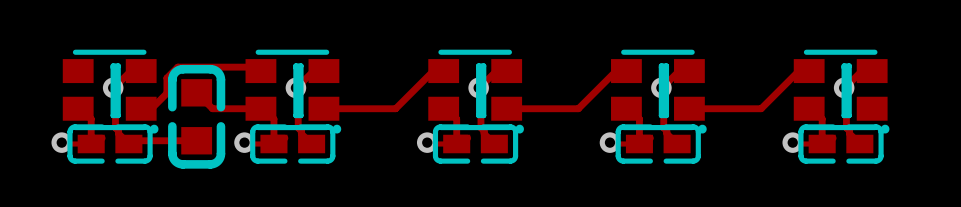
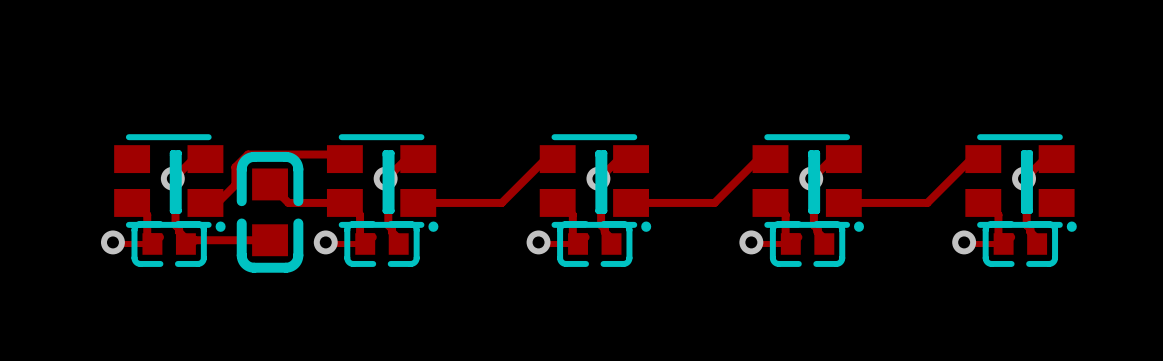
part footprint: [67, 124, 153, 164] -> [131, 221, 207, 267]
part footprint: [250, 124, 336, 164] -> [344, 221, 420, 267]
part footprint: [432, 124, 519, 164] -> [557, 221, 633, 267]
part footprint: [615, 124, 701, 164] -> [769, 221, 846, 267]
part footprint: [798, 124, 884, 164] -> [982, 221, 1059, 267]

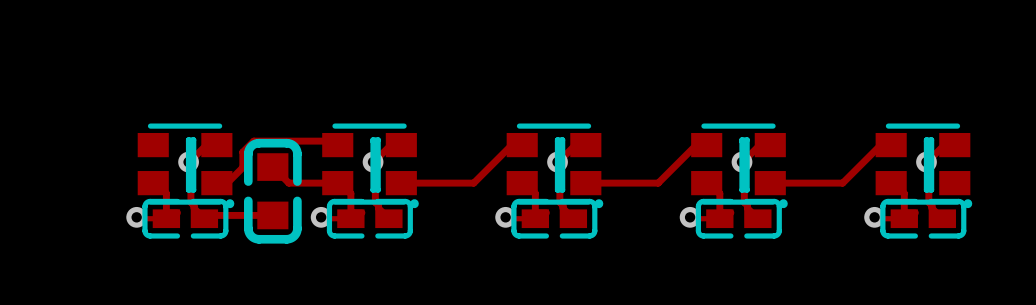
part footprint: [131, 221, 207, 267] -> [142, 198, 229, 239]
part footprint: [344, 221, 420, 267] -> [326, 198, 413, 239]
part footprint: [557, 221, 633, 267] -> [511, 198, 598, 239]
part footprint: [769, 221, 846, 267] -> [695, 198, 782, 239]
part footprint: [982, 221, 1059, 267] -> [880, 198, 967, 239]

